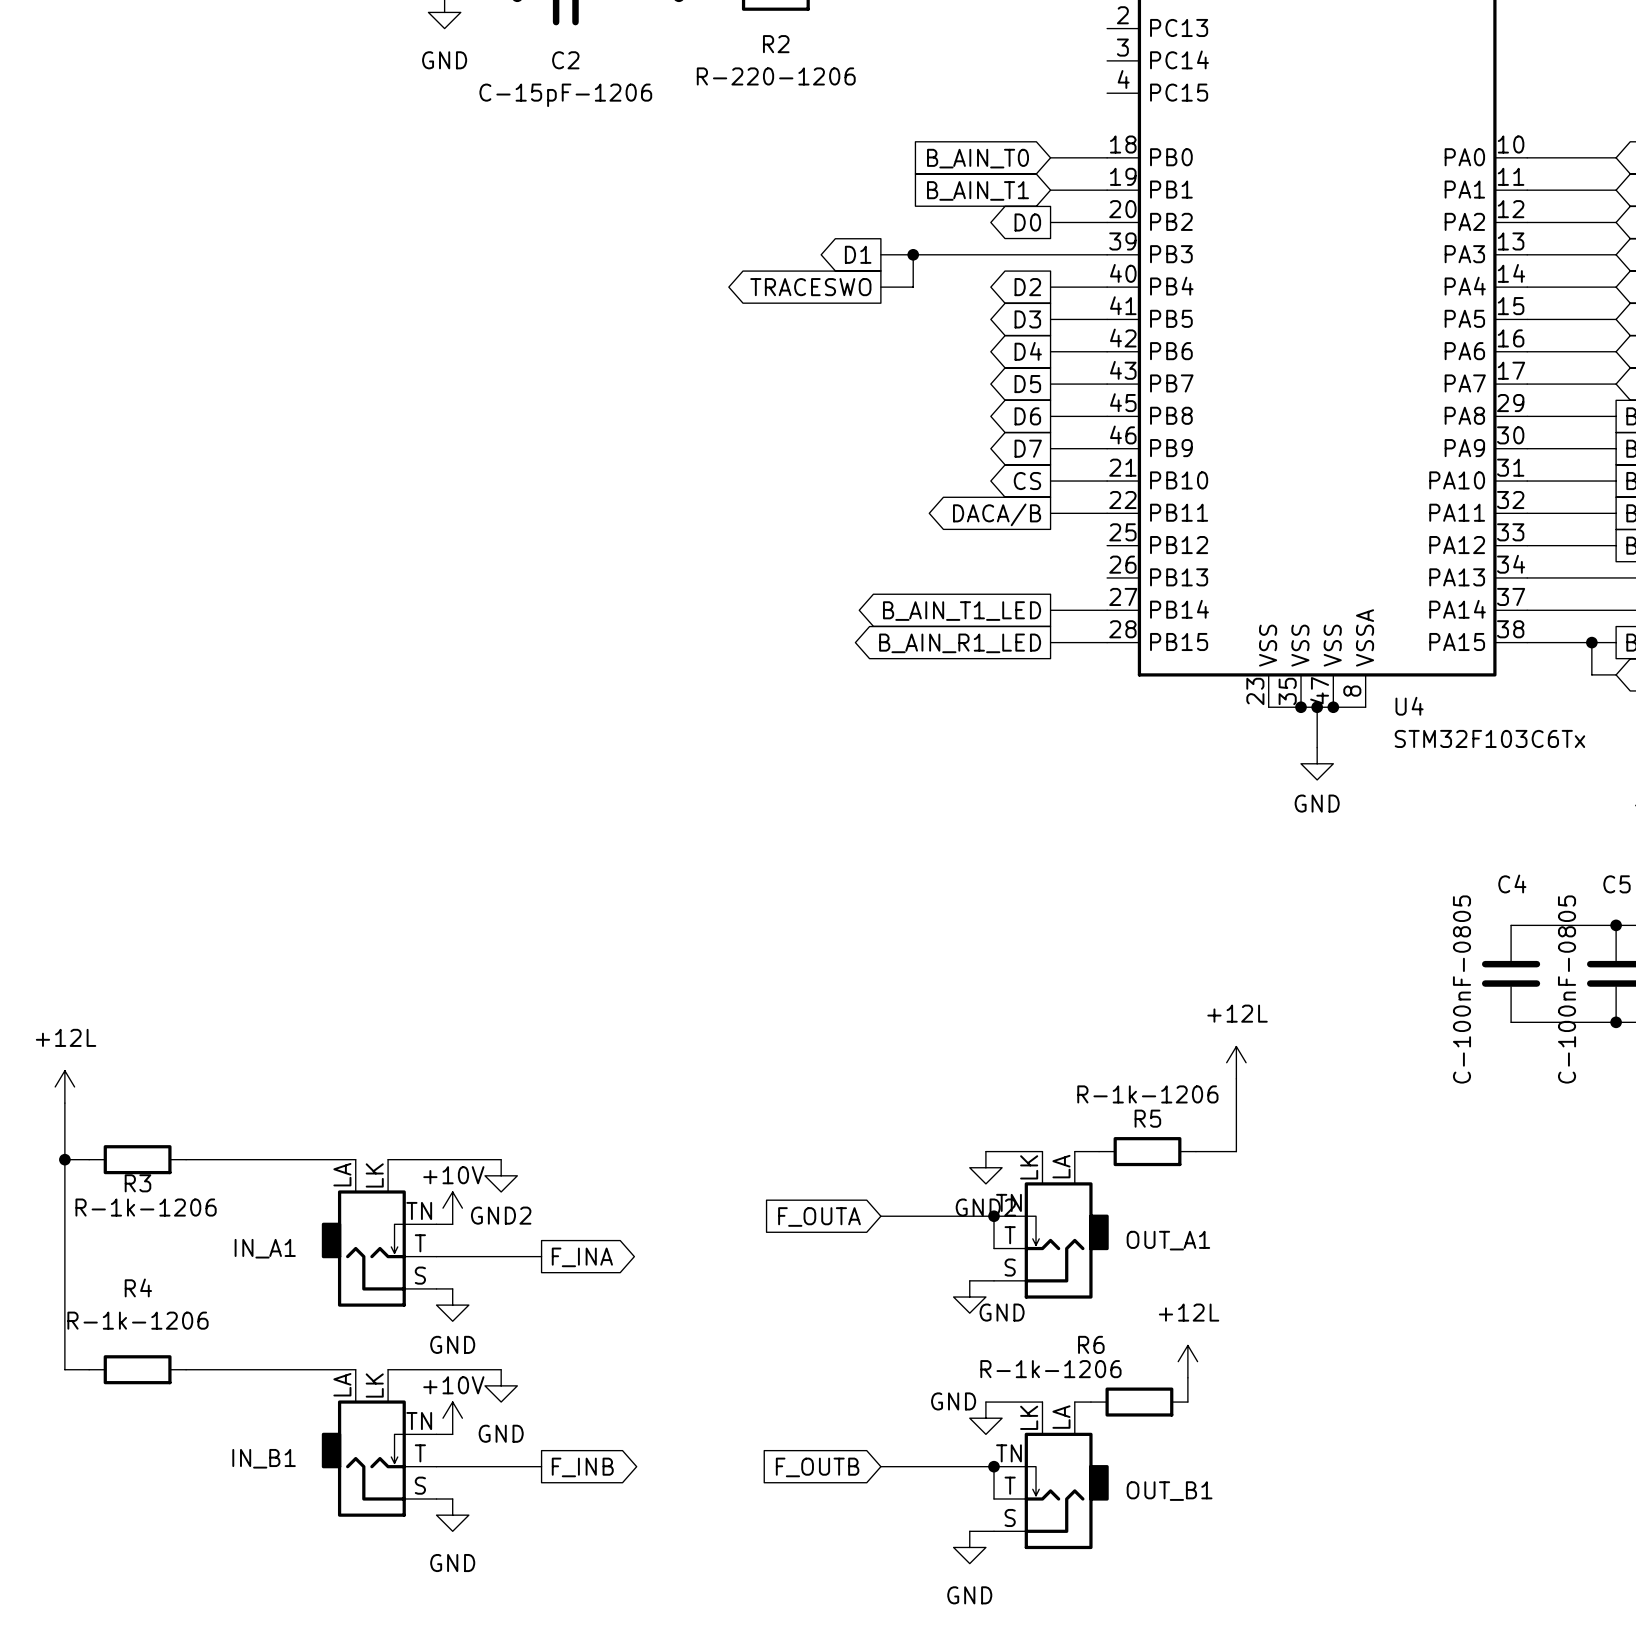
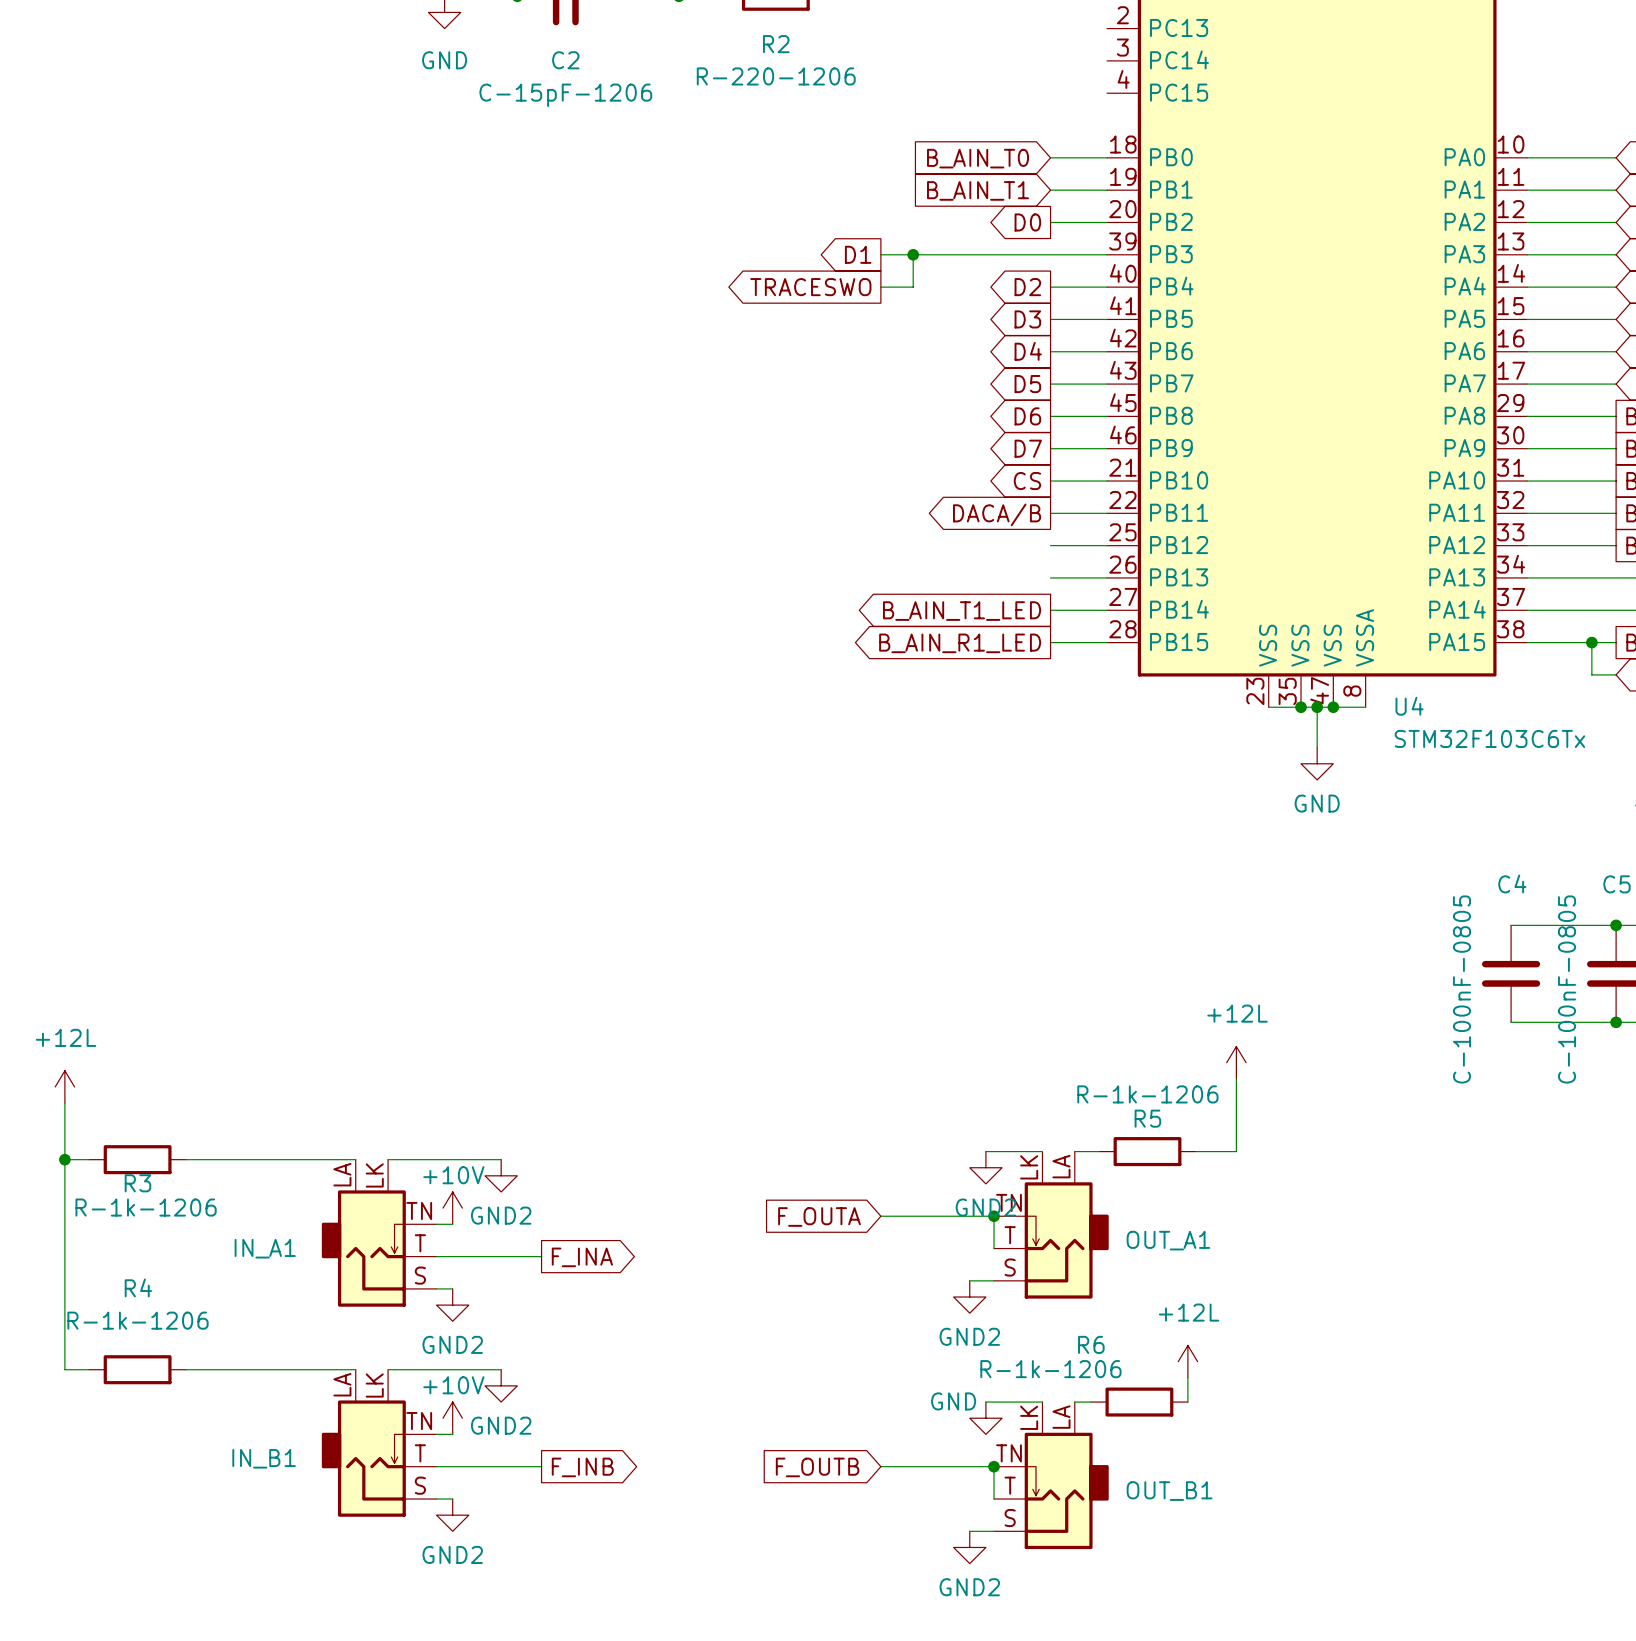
wire: none -> (1050, 545) (1107, 545)
wire: none -> (1050, 577) (1107, 577)
power symbol: GND (969, 1297) -> GND2 (969, 1297)
power symbol: GND (452, 1305) -> GND2 (452, 1305)
power symbol: GND (501, 1385) -> GND2 (501, 1385)
power symbol: GND (452, 1515) -> GND2 (452, 1515)
power symbol: GND (969, 1547) -> GND2 (969, 1547)

